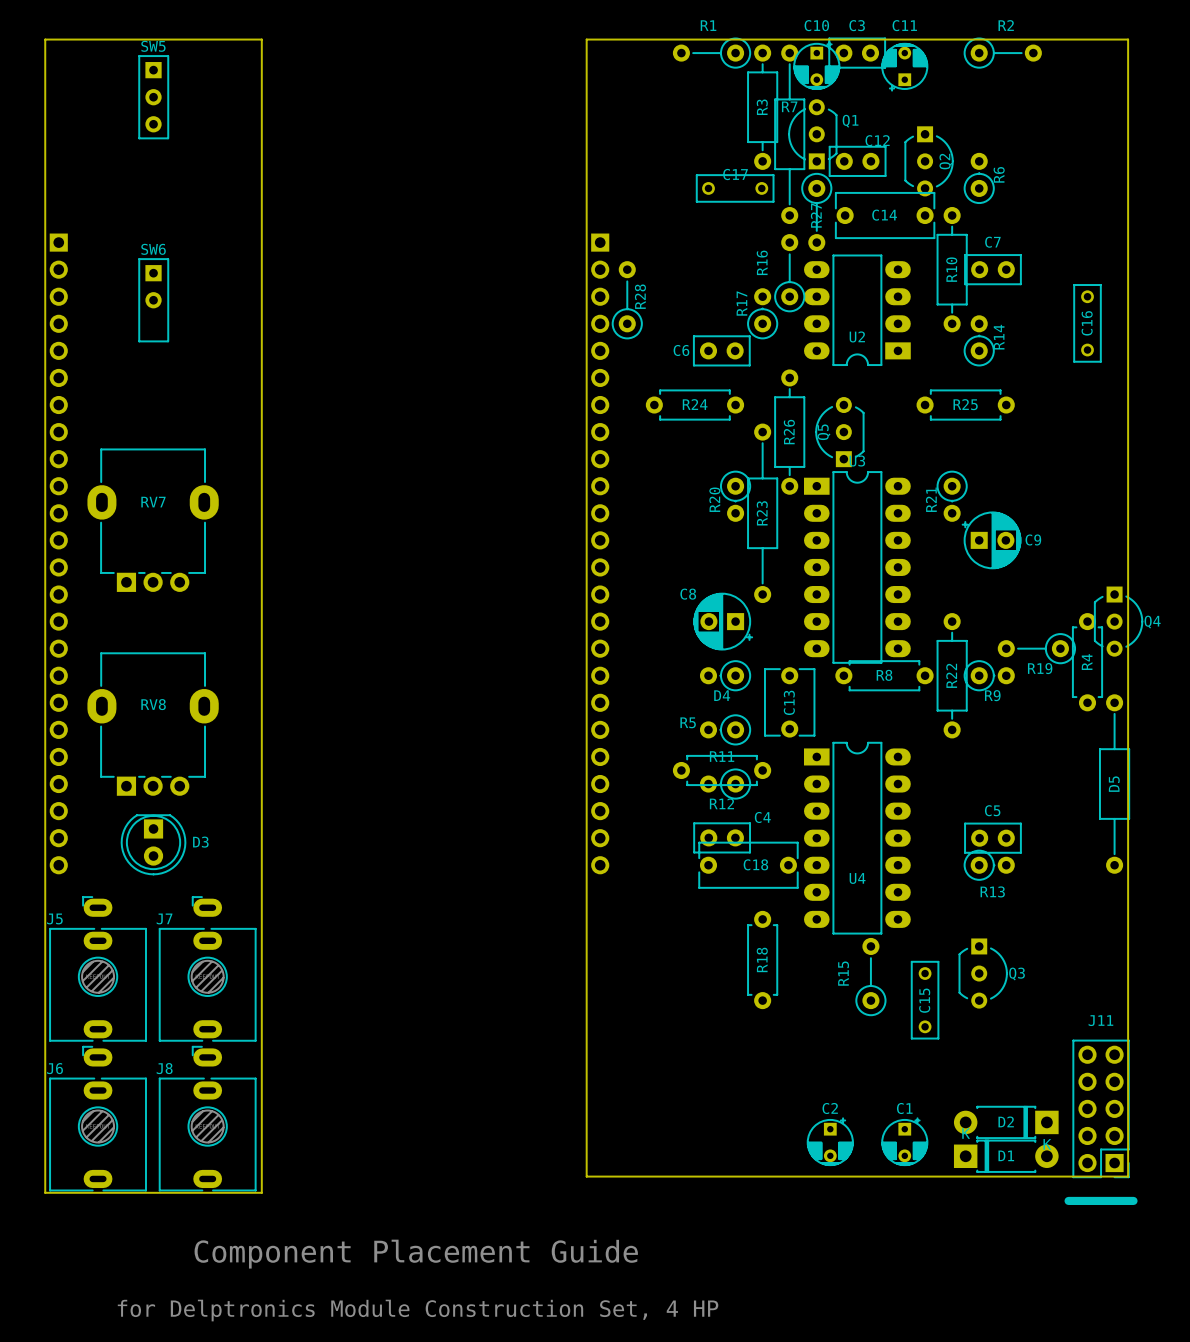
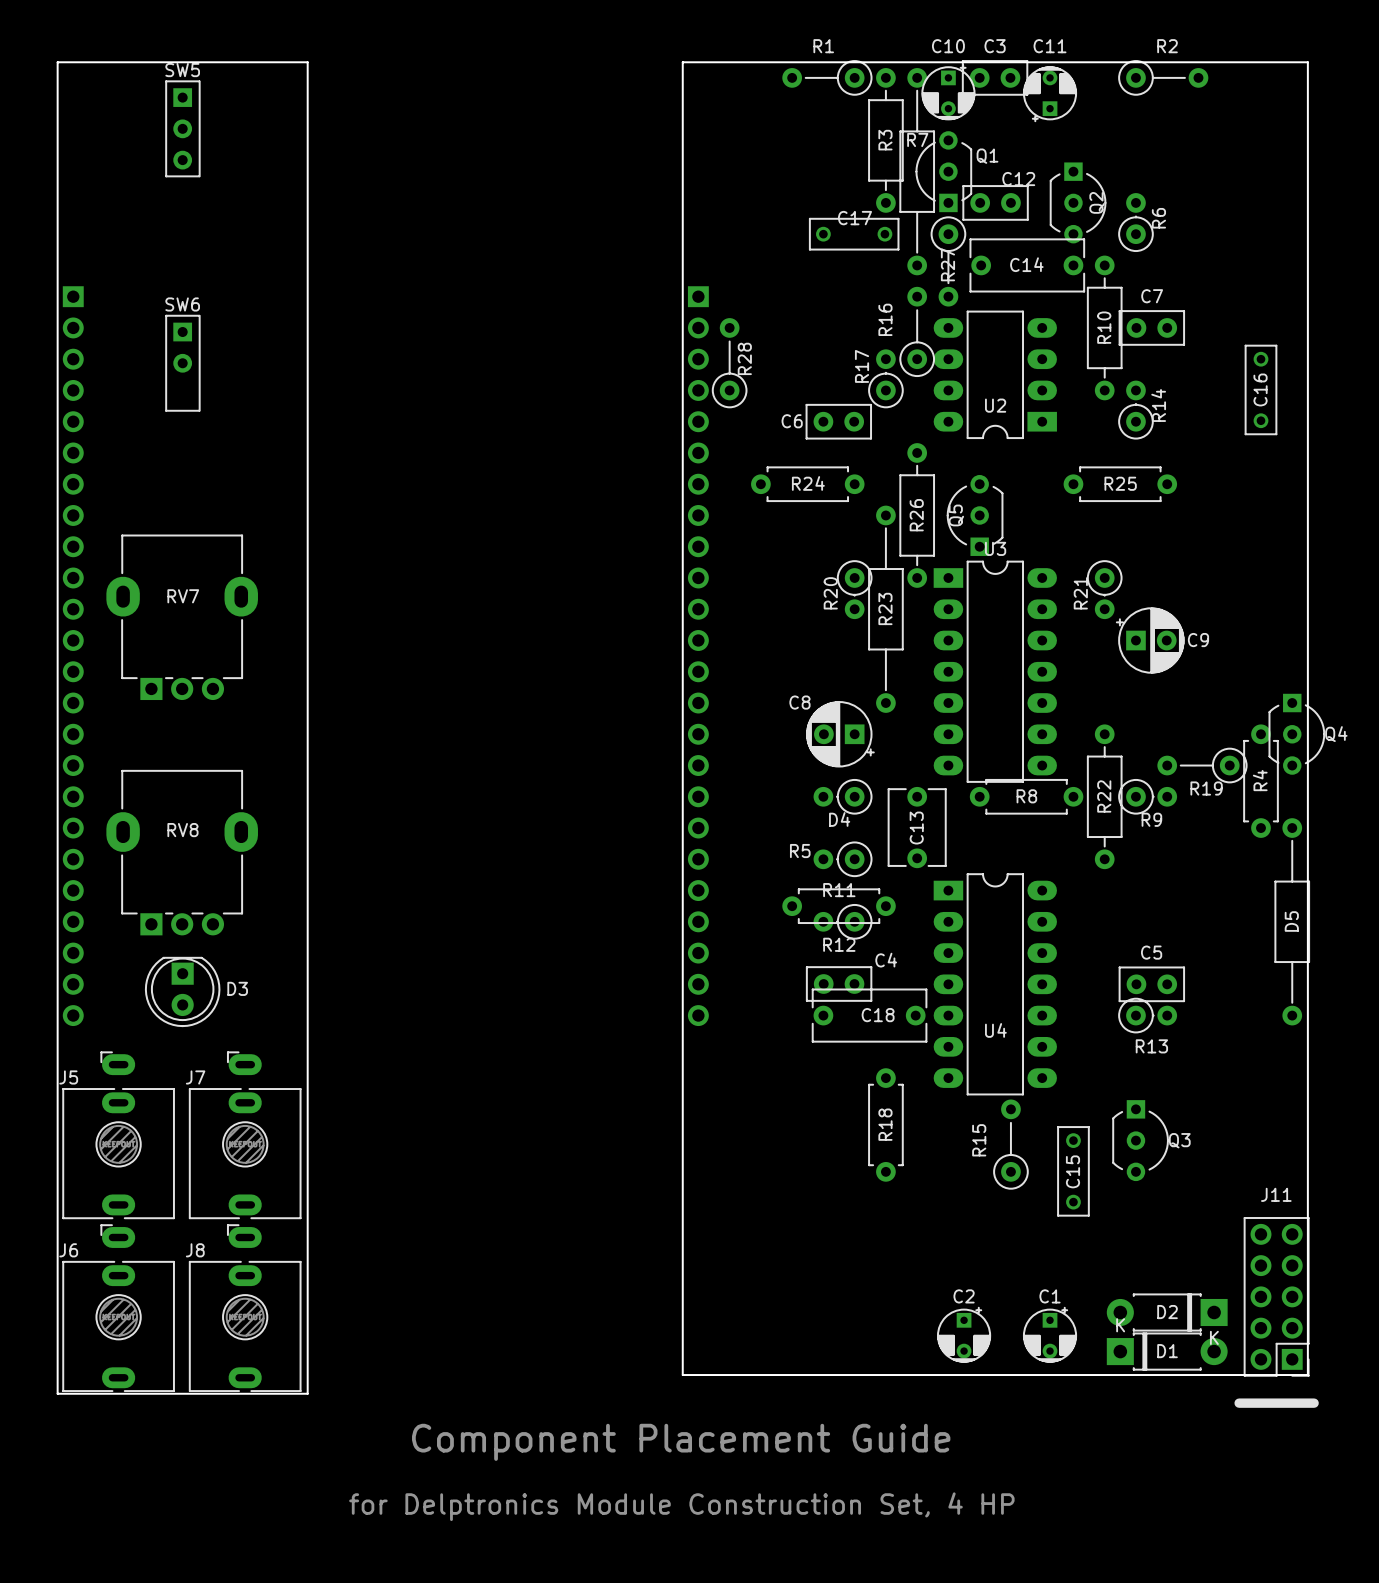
text position: Component Placement Guide (416, 1254) -> Component Placement Guide (681, 1442)
text position: for Delptronics Module Construction Set, 4 HP (418, 1310) -> for Delptronics Module Construction Set, 4 HP (681, 1506)

